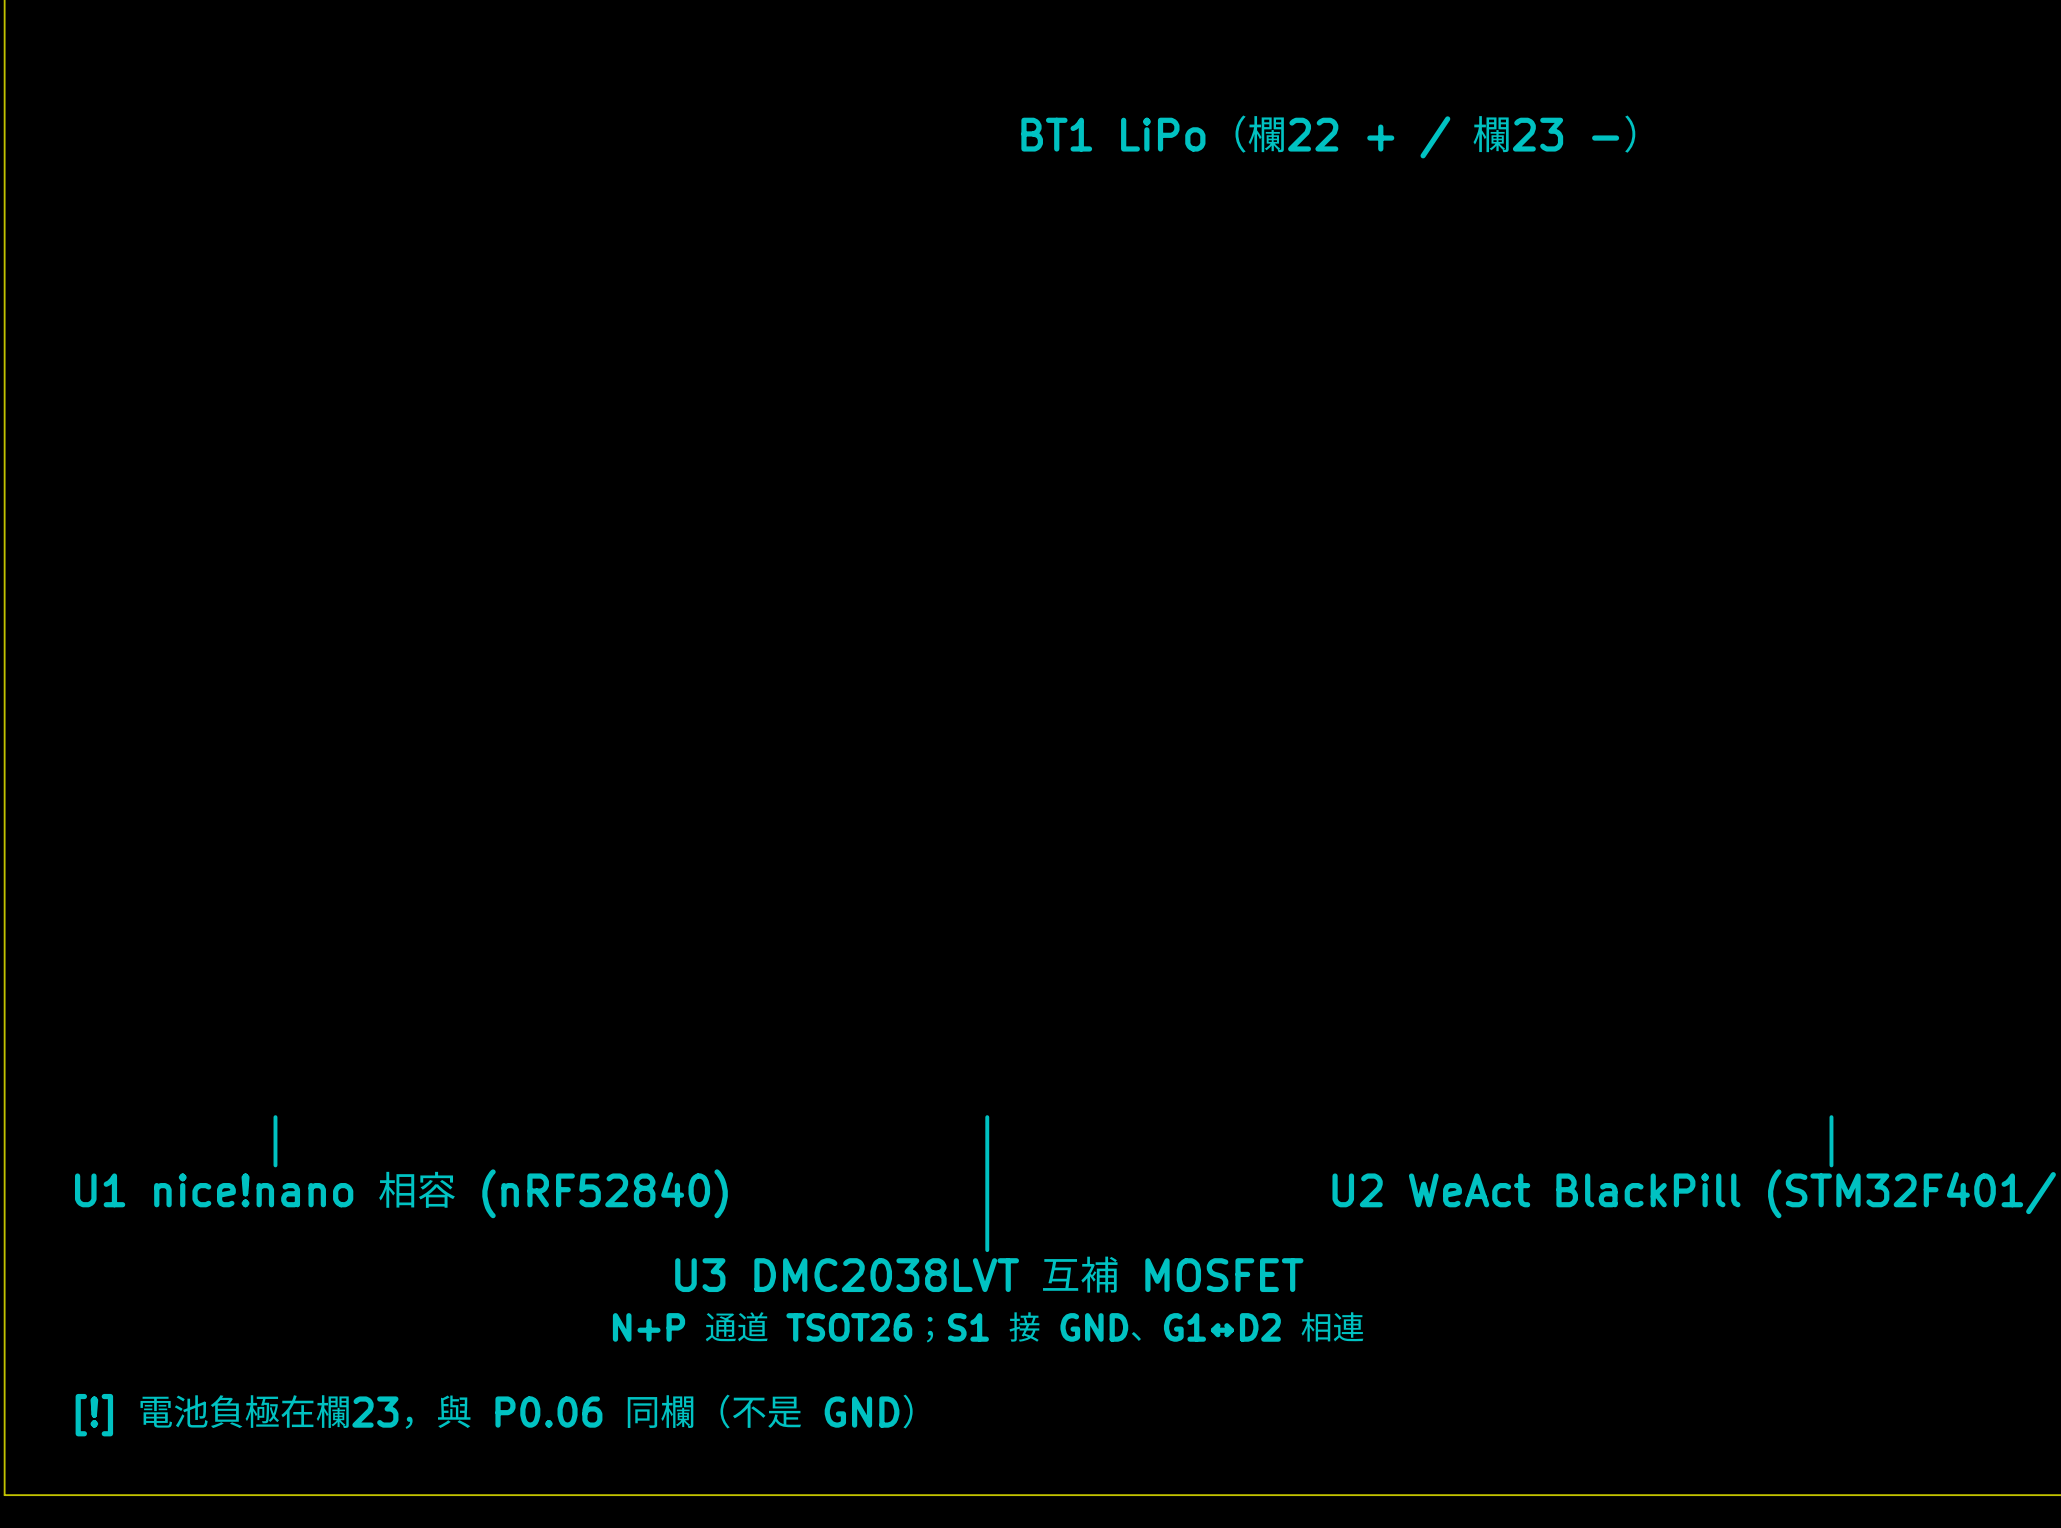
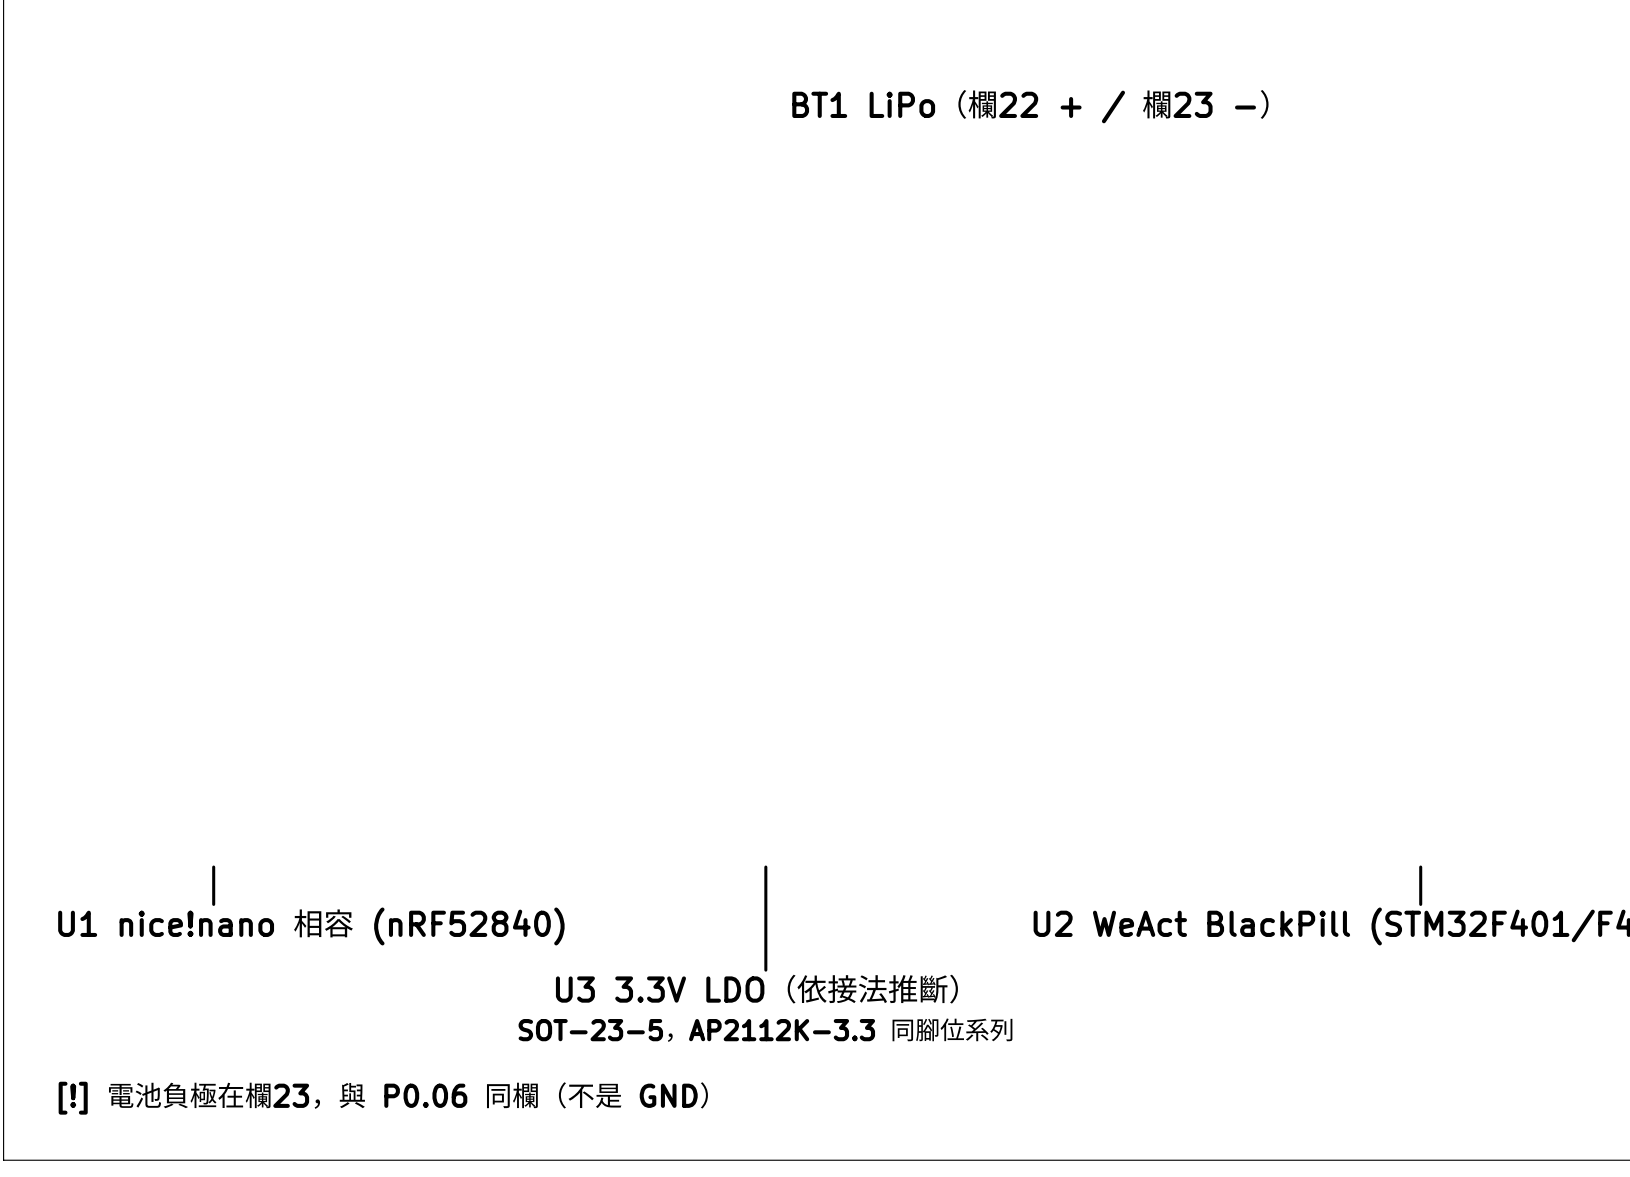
text: U3 DMC2038LVT 互補 MOSFET (989, 1274) -> U3 3.3V LDO（依接法推斷） (757, 989)
text: N+P 通道 TSOT26；S1 接 GND、G1↔D2 相連 (989, 1327) -> SOT-23-5，AP2112K-3.3 同腳位系列 (766, 1030)

